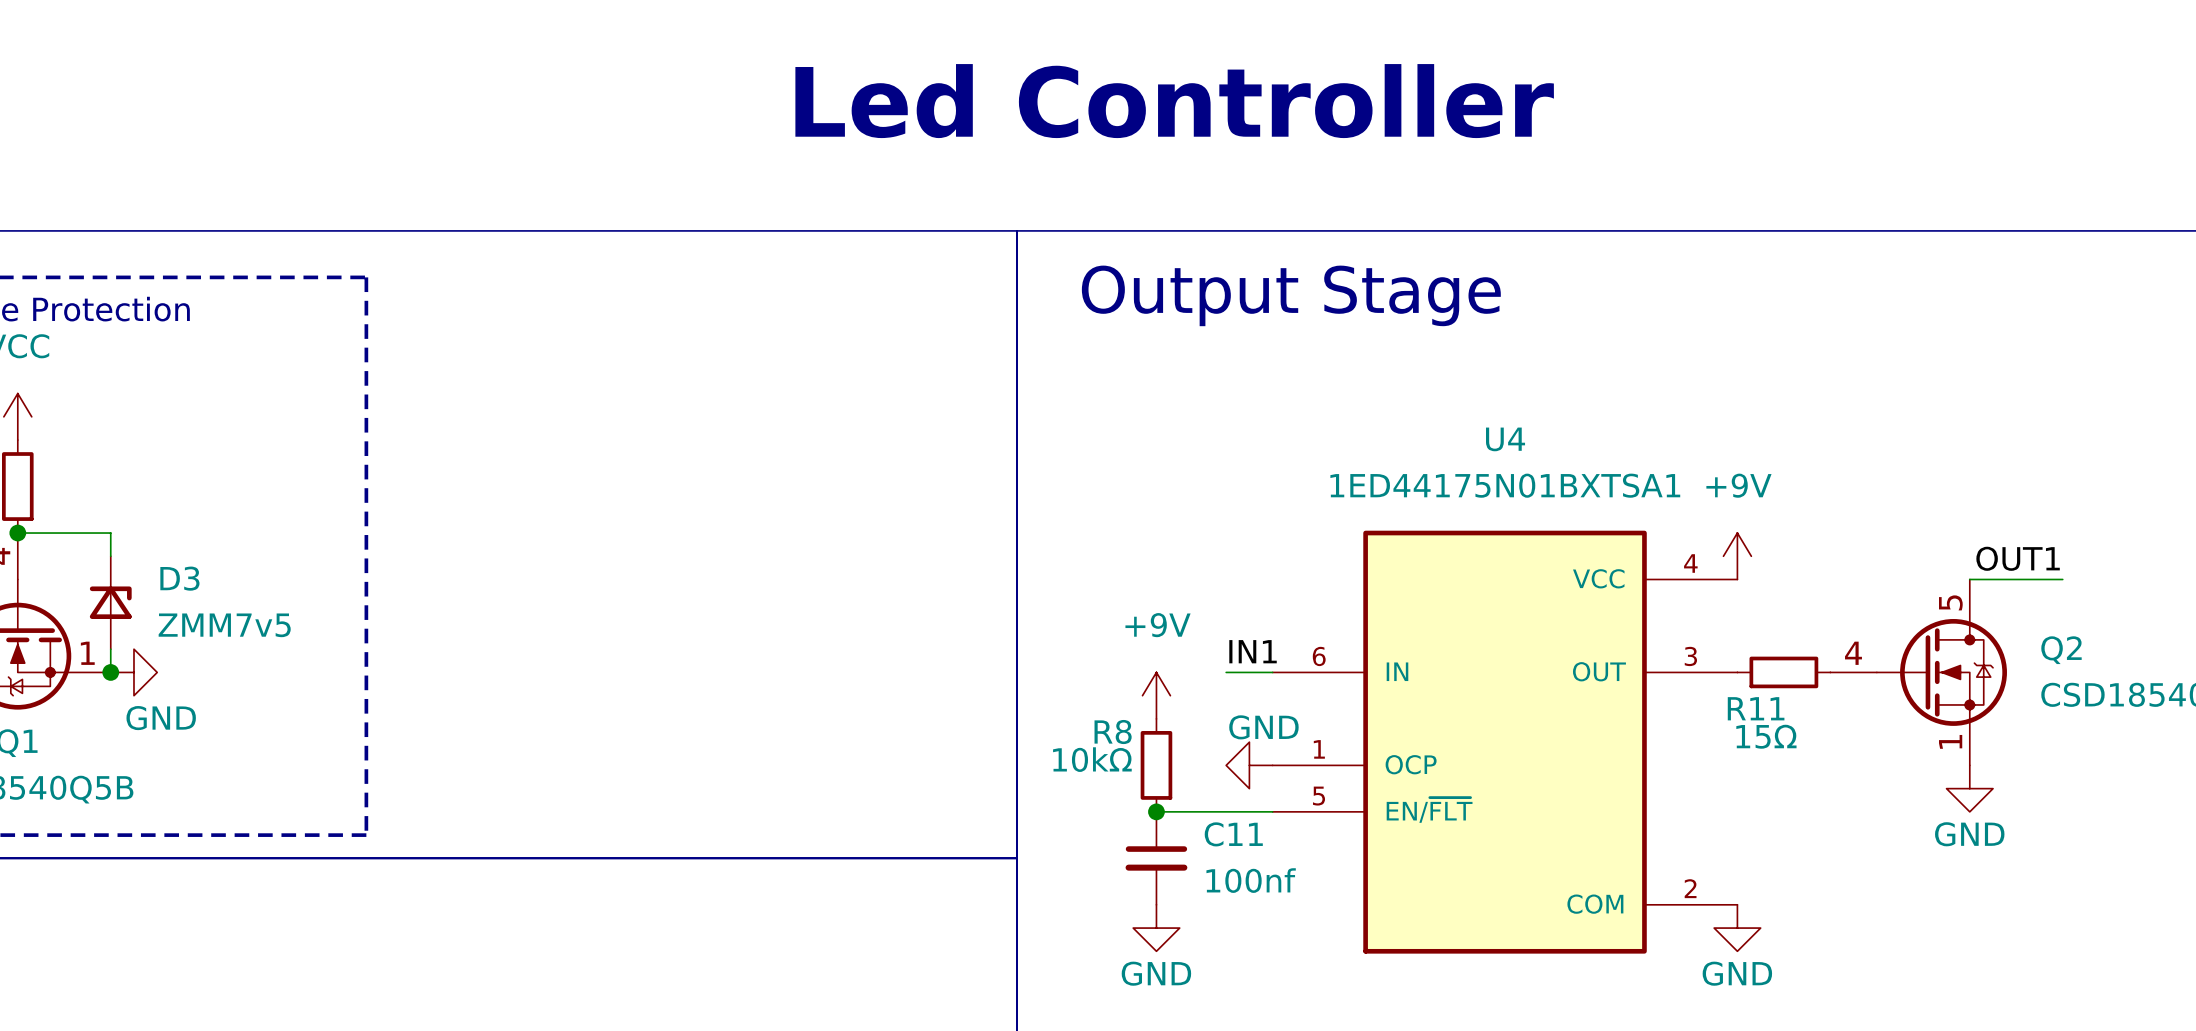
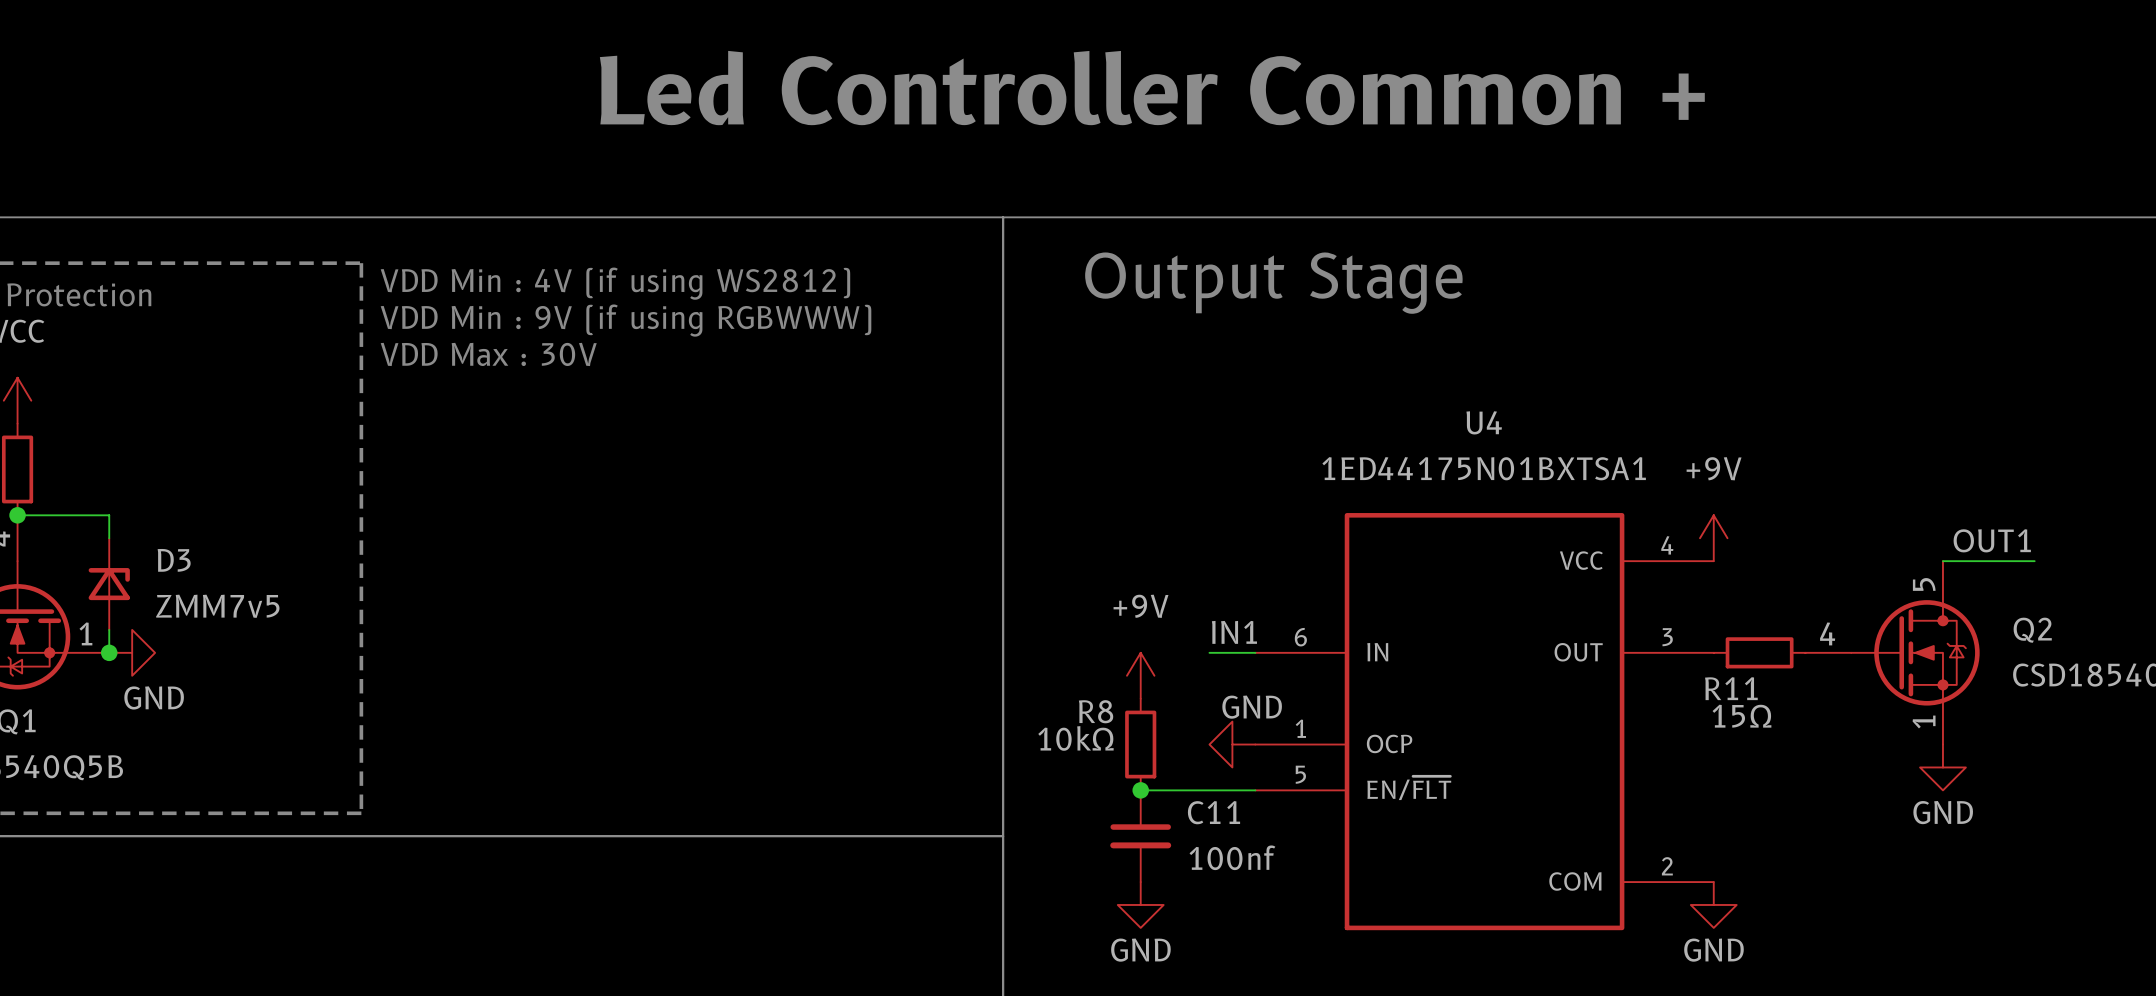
text: Led Controller (1174, 101) -> Led Controller Common + (1152, 88)
text: none -> VDD Min : 4V (if using WS2812) (615, 283)
text: none -> VDD Min : 9V (if using RGBWWW) (626, 320)
text: none -> VDD Max : 30V (488, 354)

